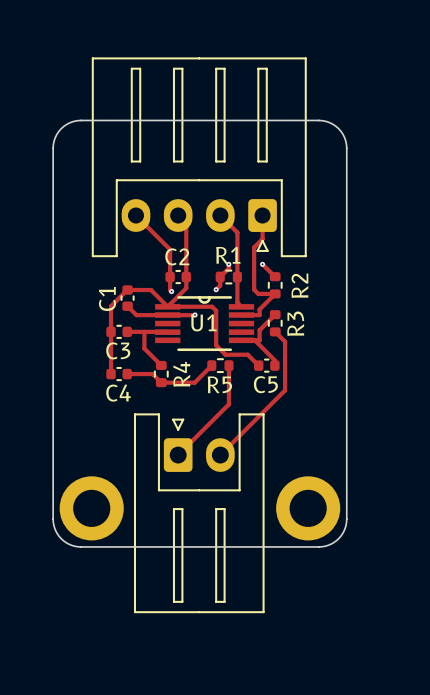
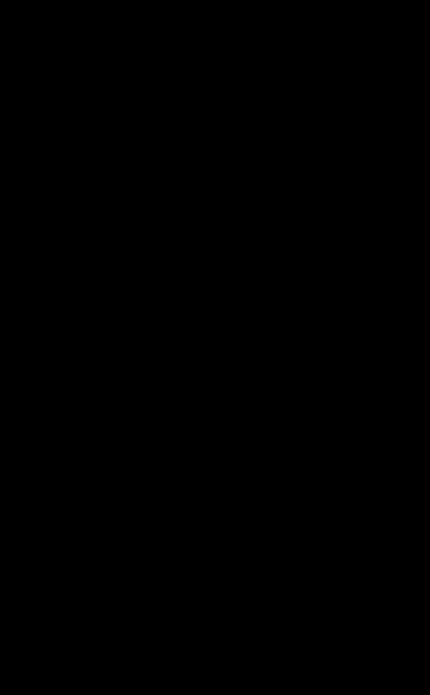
board edge: (81, 120) (318, 120) (332, 124) (343, 134) (346, 148) (346, 519) (343, 533) (332, 543) (318, 546) (81, 546) (67, 543) (56, 533) (53, 519) (53, 148) (55, 137) (61, 128) (70, 122) (81, 120) -> none
part: (199, 157) -> none
track: (136, 215) (170, 249) (171, 291) -> none
track: (178, 215) (186, 223) (186, 288) (167, 306) -> none
track: (220, 215) (237, 232) (237, 302) (241, 306) -> none
track: (262, 215) (262, 239) (254, 247) (254, 289) (258, 293) (275, 293) (259, 309) (259, 315) (241, 315) -> none
track: (228, 264) (228, 268) (220, 277) (220, 285) (216, 289) -> none
via: (228, 264) -> none
track: (262, 264) (274, 276) -> none
via: (262, 264) -> none
C2: (178, 277) -> none
R1: (228, 277) -> none
R2: (275, 285) -> none
via: (216, 289) -> none
via: (171, 291) -> none
C1: (127, 298) -> none
track: (127, 306) (136, 315) (194, 315) -> none
track: (167, 306) (212, 306) (216, 310) (216, 345) (225, 354) (247, 354) (258, 365) -> none
track: (167, 306) (151, 290) (127, 290) (111, 306) (111, 374) -> none
via: (195, 314) -> none
track: (275, 314) (259, 330) (259, 340) (254, 340) (274, 360) (274, 365) -> none
text: U1 (203, 322) -> none
part: (204, 323) -> none
R3: (275, 323) -> none
C3: (119, 331) -> none
track: (127, 331) (167, 331) -> none
track: (144, 331) (144, 348) (161, 365) -> none
track: (275, 331) (285, 341) (285, 390) (220, 455) -> none
track: (211, 365) (194, 382) (161, 382) (152, 374) (127, 374) -> none
R5: (220, 365) -> none
track: (228, 365) (228, 404) (178, 455) -> none
C5: (266, 365) -> none
C4: (119, 374) -> none
R4: (161, 374) -> none
part: (91, 508) -> none
part: (308, 508) -> none
part: (199, 513) -> none

